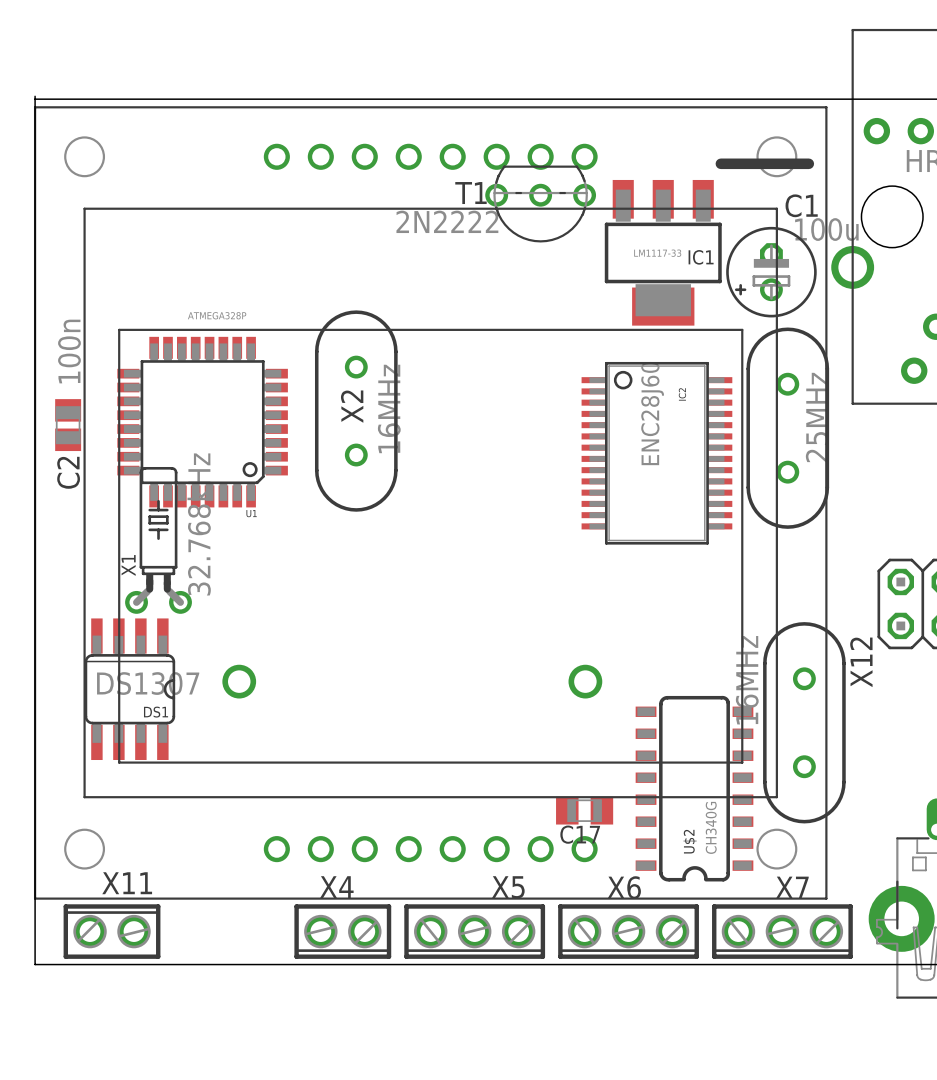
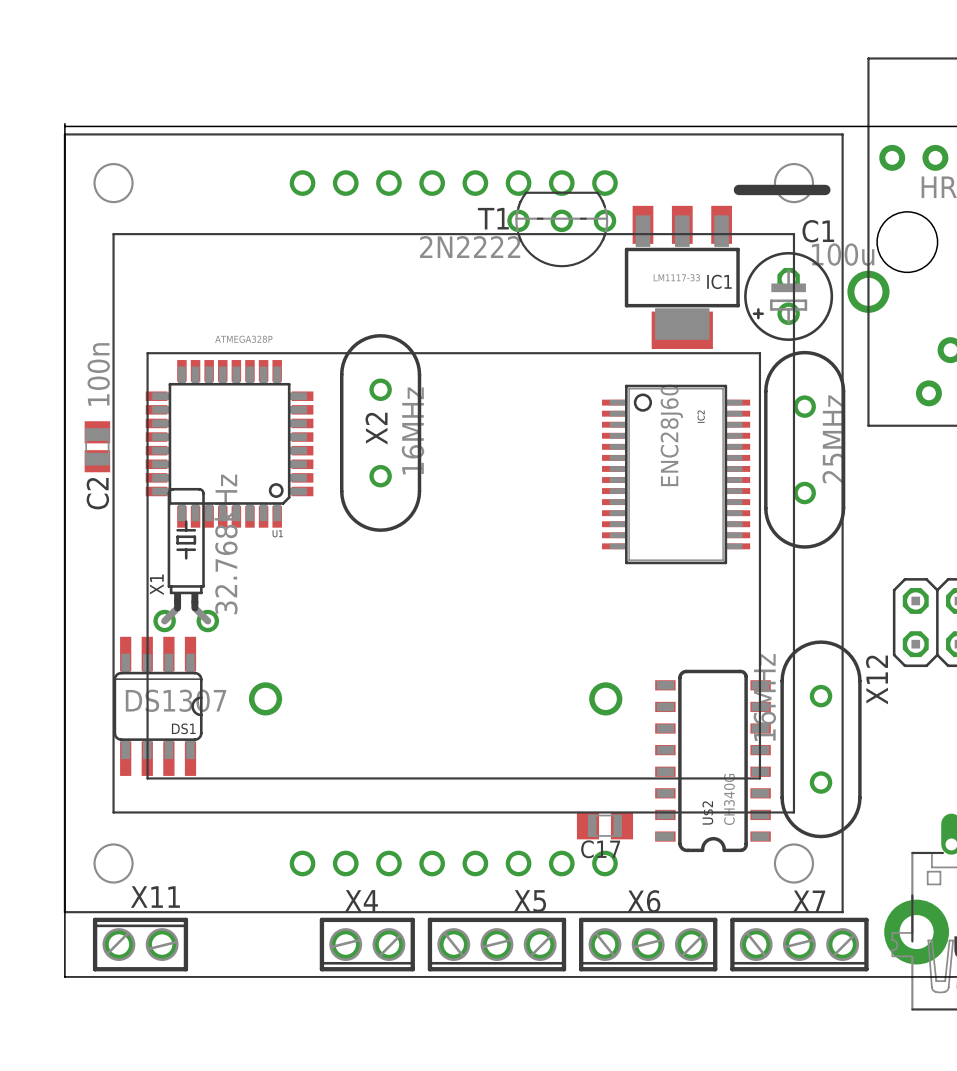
U$2 position: (694, 788) -> (713, 760)

